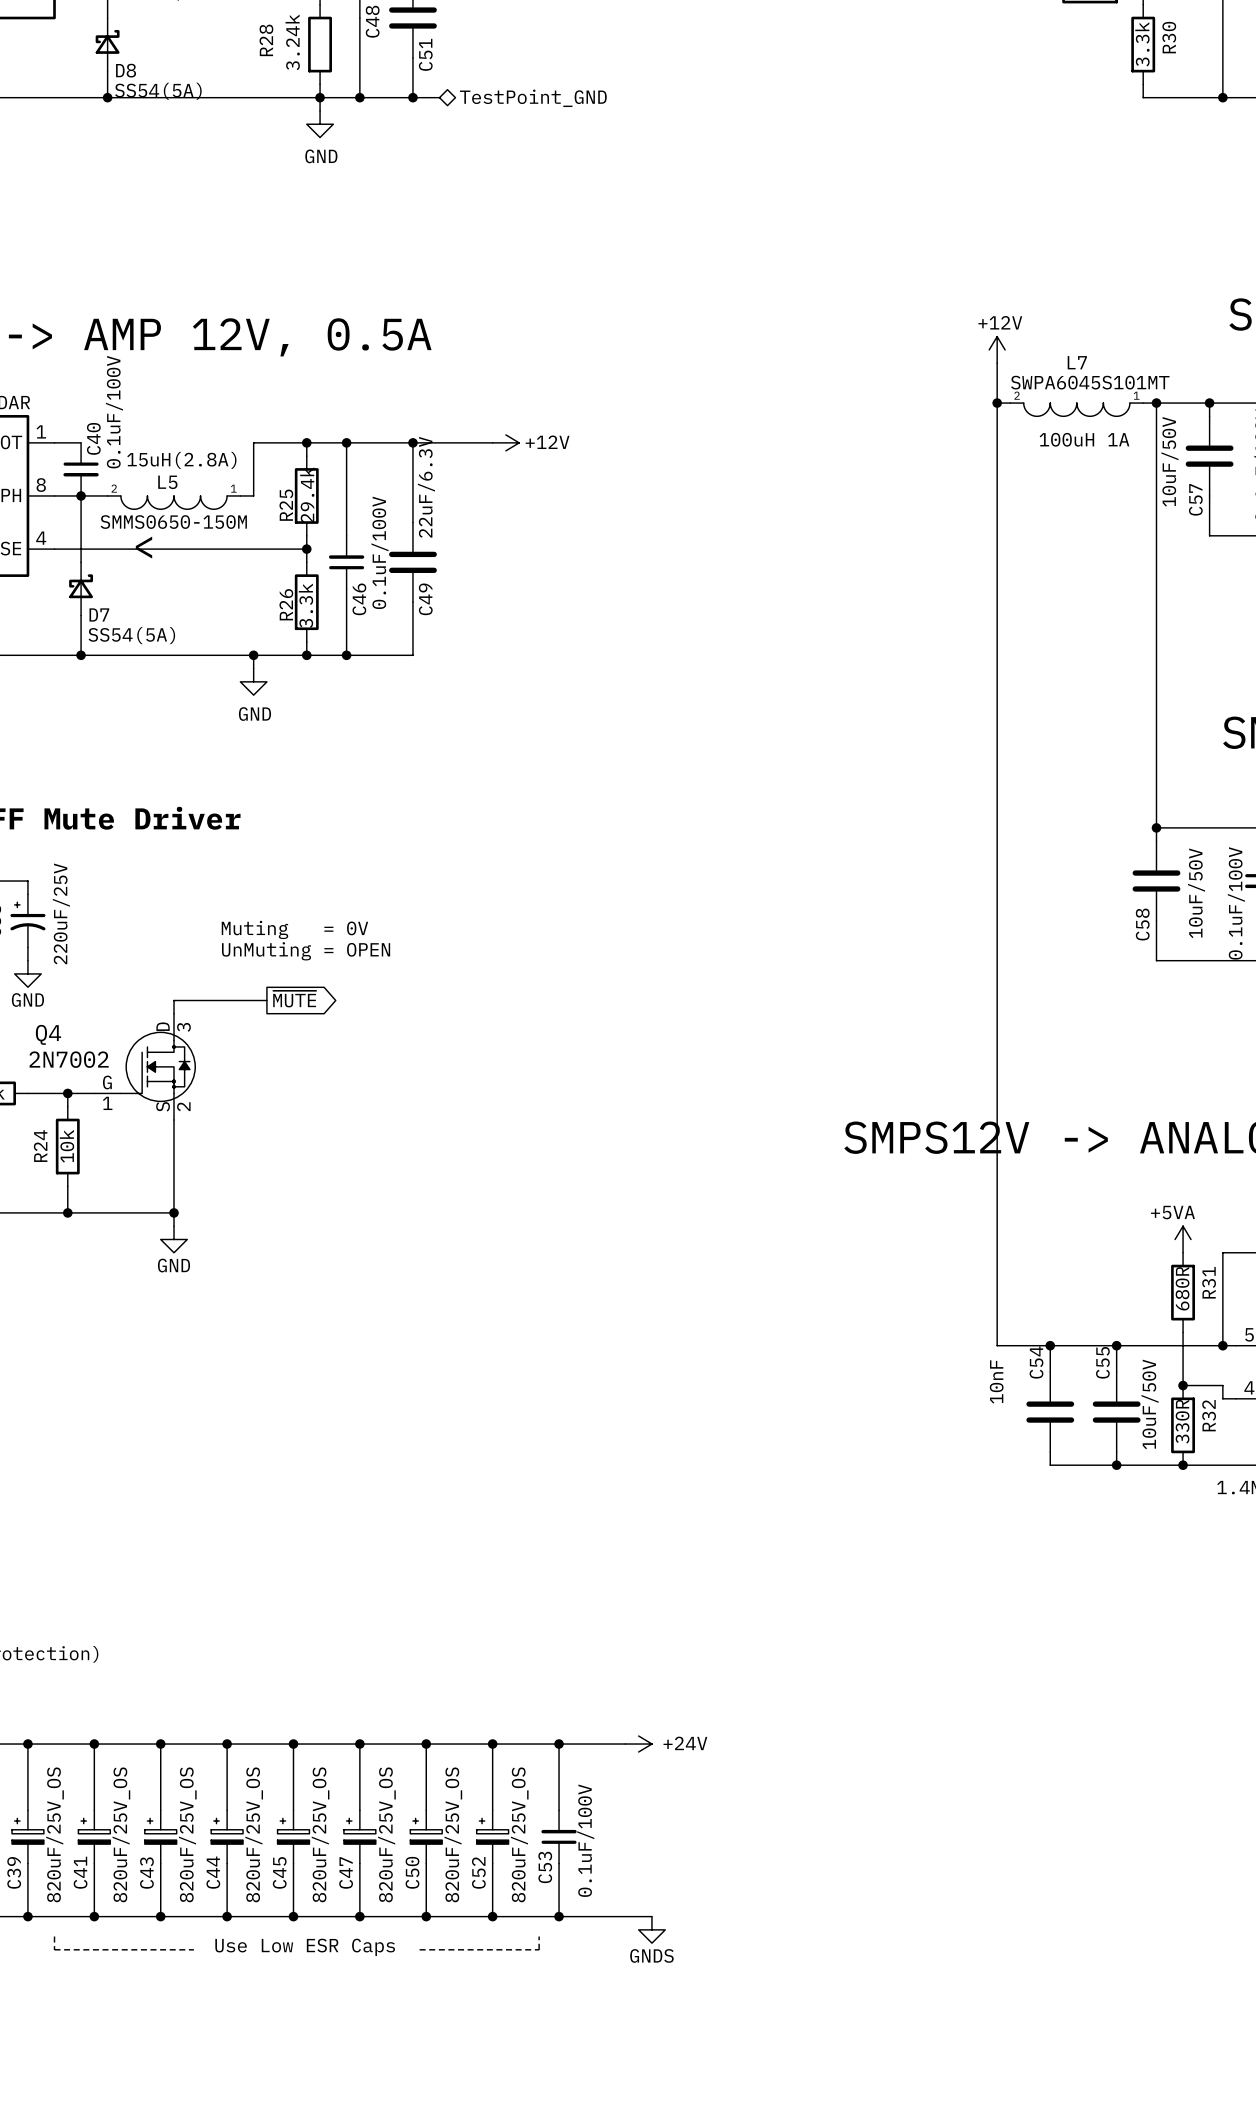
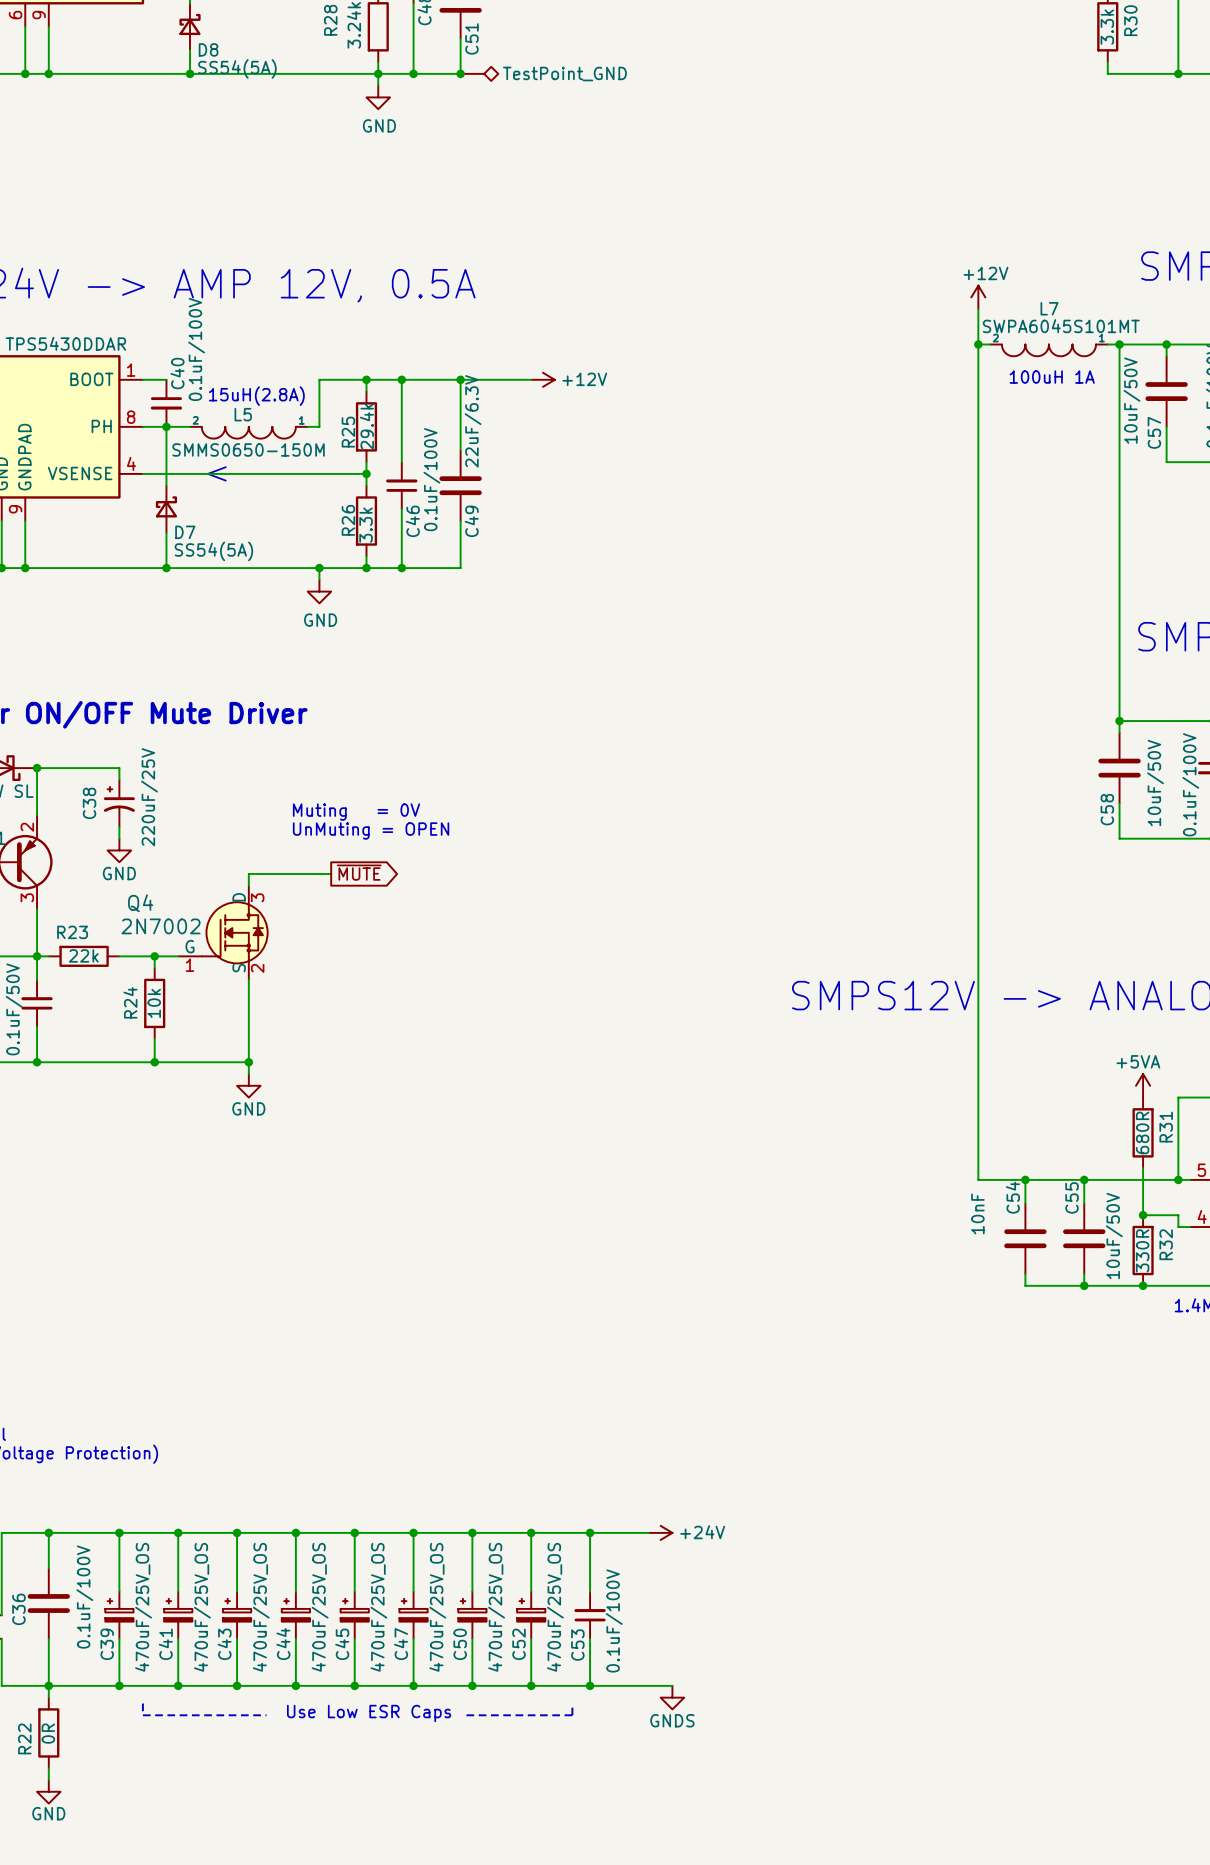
C39 value: 820uF/25V_OS (55, 1834) -> 470uF/25V_OS (143, 1607)
C41 value: 820uF/25V_OS (121, 1834) -> 470uF/25V_OS (202, 1607)
C43 value: 820uF/25V_OS (187, 1834) -> 470uF/25V_OS (261, 1607)
C44 value: 820uF/25V_OS (254, 1834) -> 470uF/25V_OS (320, 1607)
C45 value: 820uF/25V_OS (320, 1834) -> 470uF/25V_OS (378, 1607)
C47 value: 820uF/25V_OS (386, 1834) -> 470uF/25V_OS (437, 1607)
C50 value: 820uF/25V_OS (453, 1834) -> 470uF/25V_OS (496, 1607)
C52 value: 820uF/25V_OS (519, 1834) -> 470uF/25V_OS (555, 1607)

